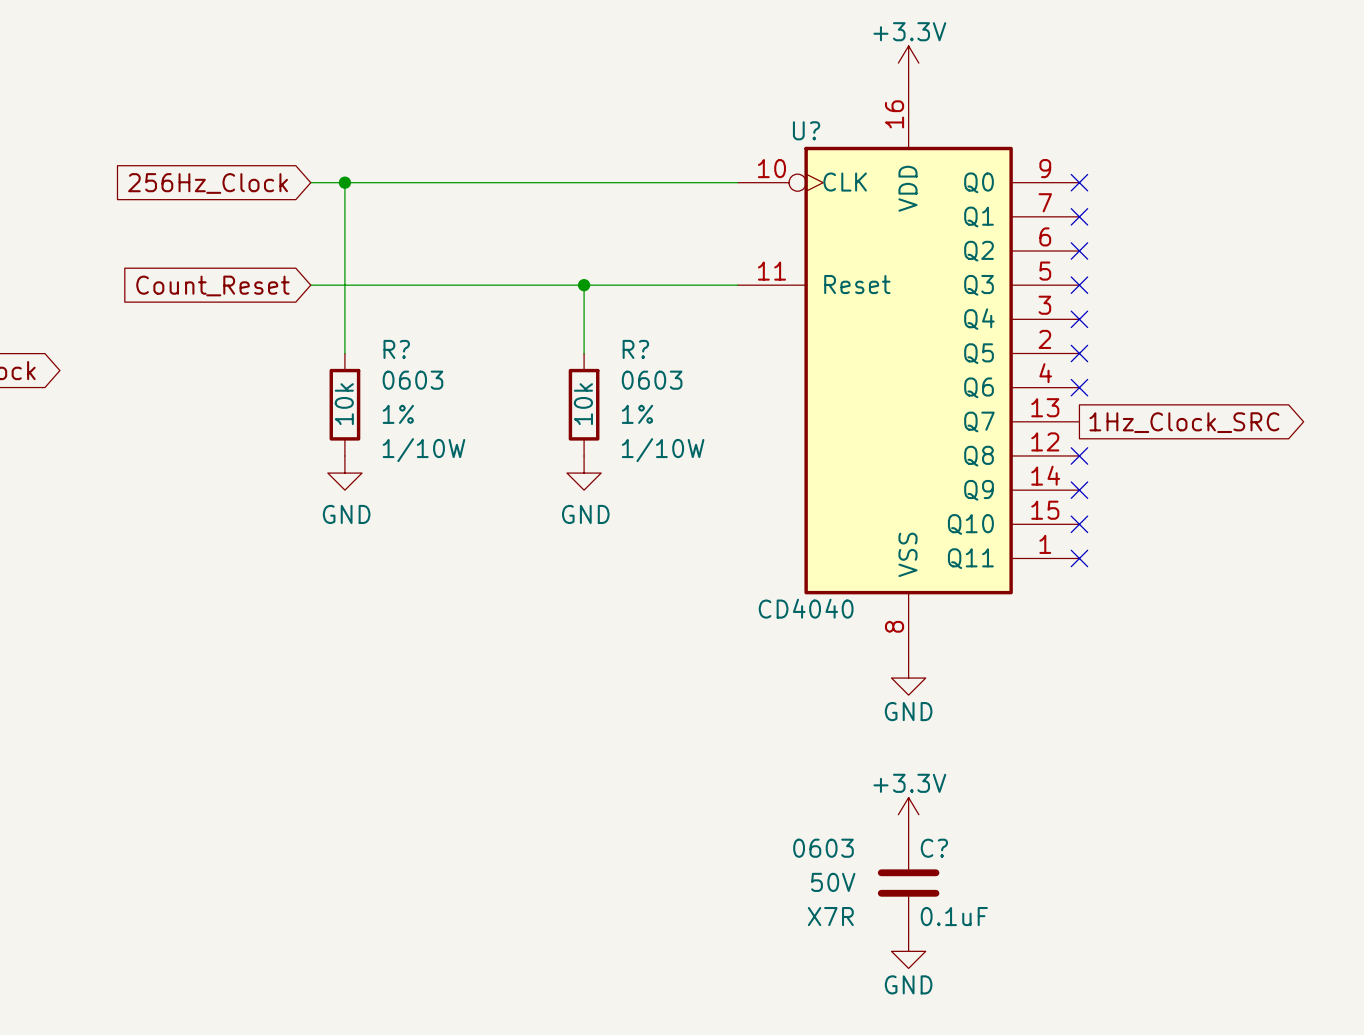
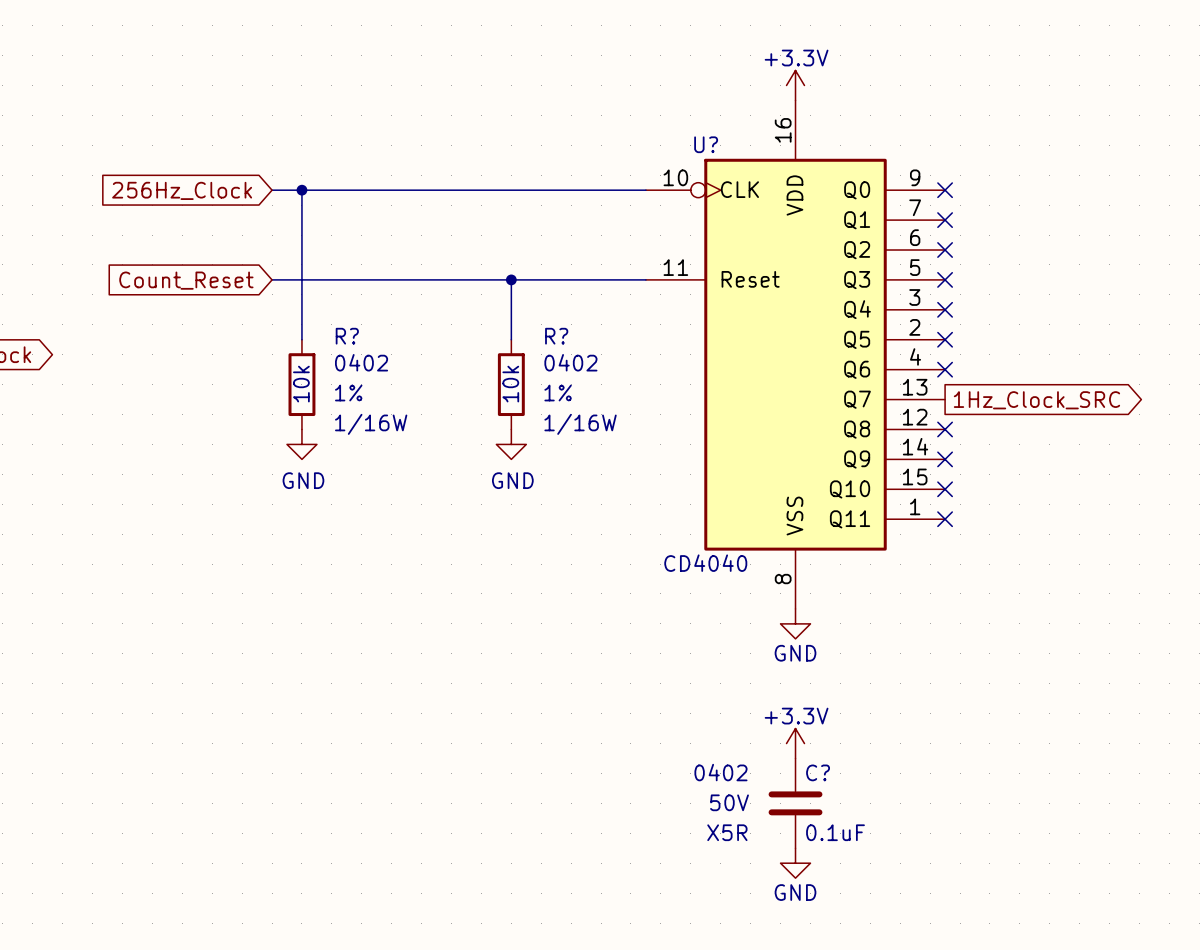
R? text: 0603 (412, 380) -> 0402 (361, 362)
R? text: 0603 (652, 380) -> 0402 (570, 362)
R? text: 1/10W (423, 450) -> 1/16W (371, 424)
R? text: 1/10W (663, 450) -> 1/16W (580, 424)
C? text: 0603 (823, 848) -> 0402 (720, 772)
C? text: X7R (830, 916) -> X5R (727, 832)

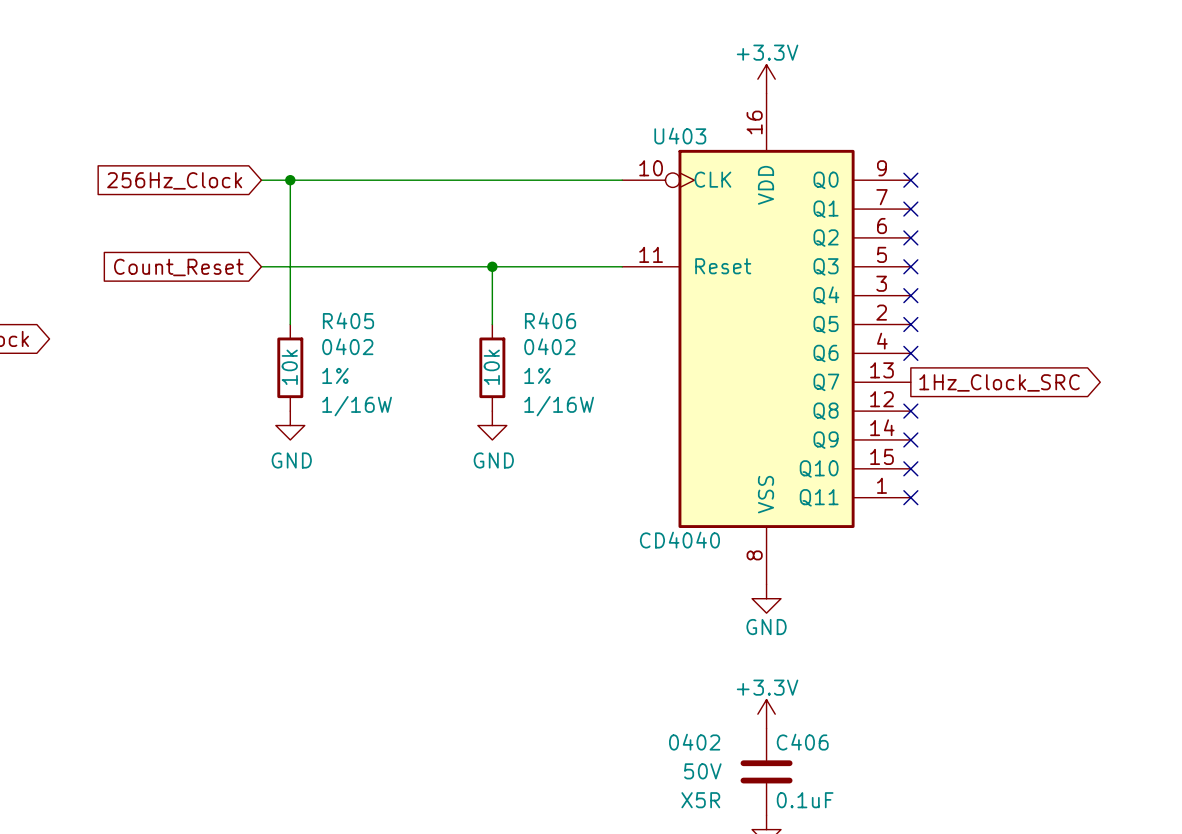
U? name: U? (706, 144) -> U403 (680, 136)
R? name: R? (347, 336) -> R405 (348, 320)
R? name: R? (556, 336) -> R406 (550, 320)
C? name: C? (818, 772) -> C406 (802, 742)

